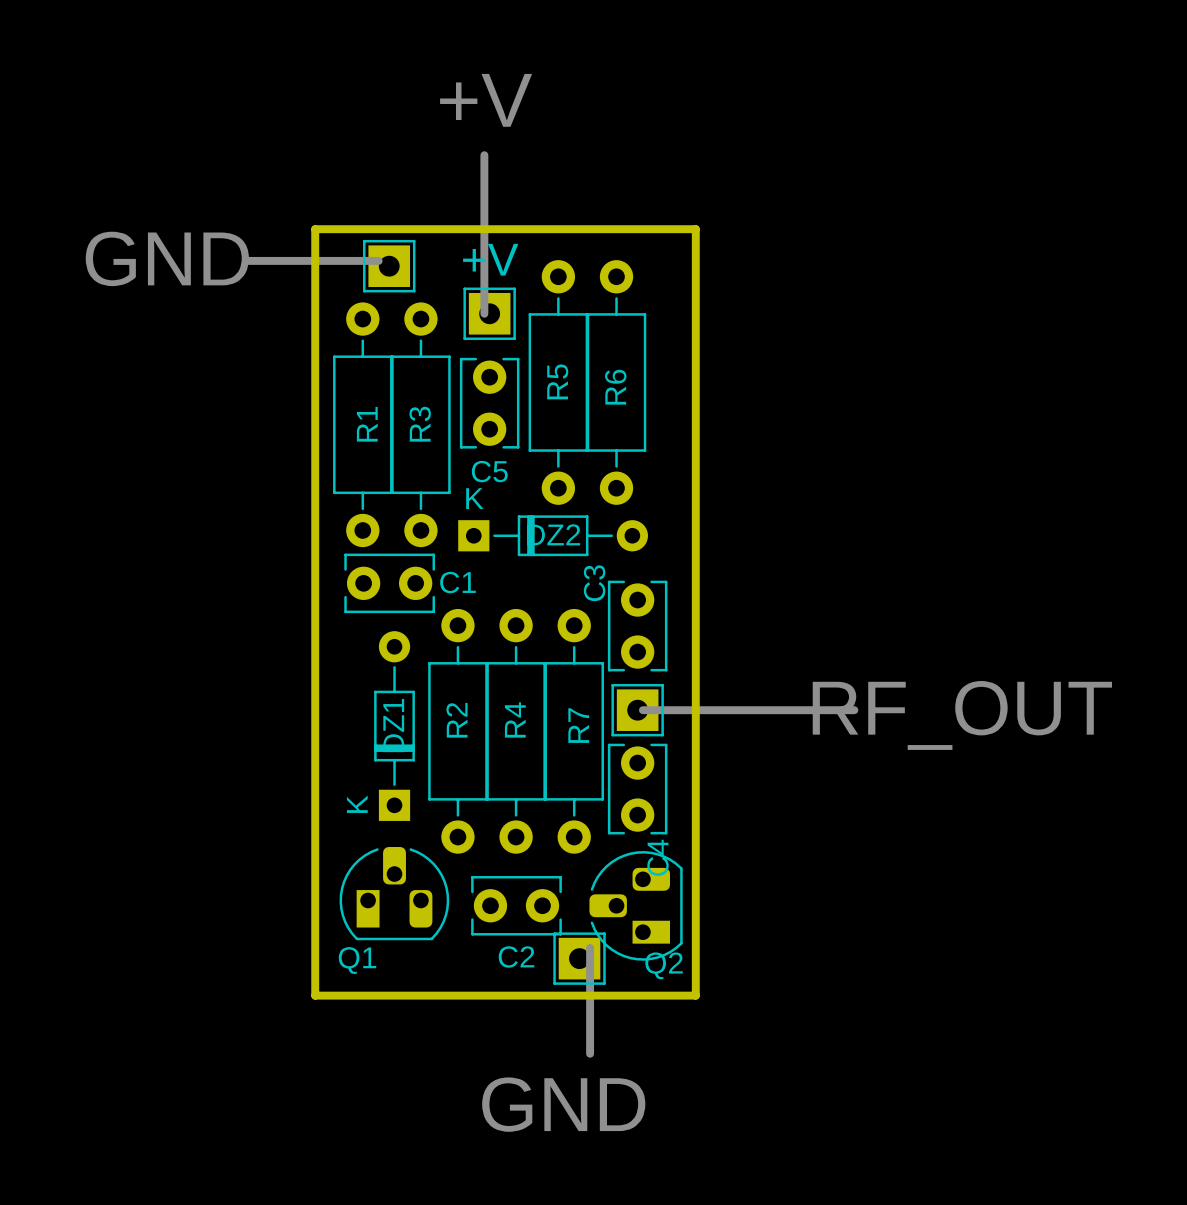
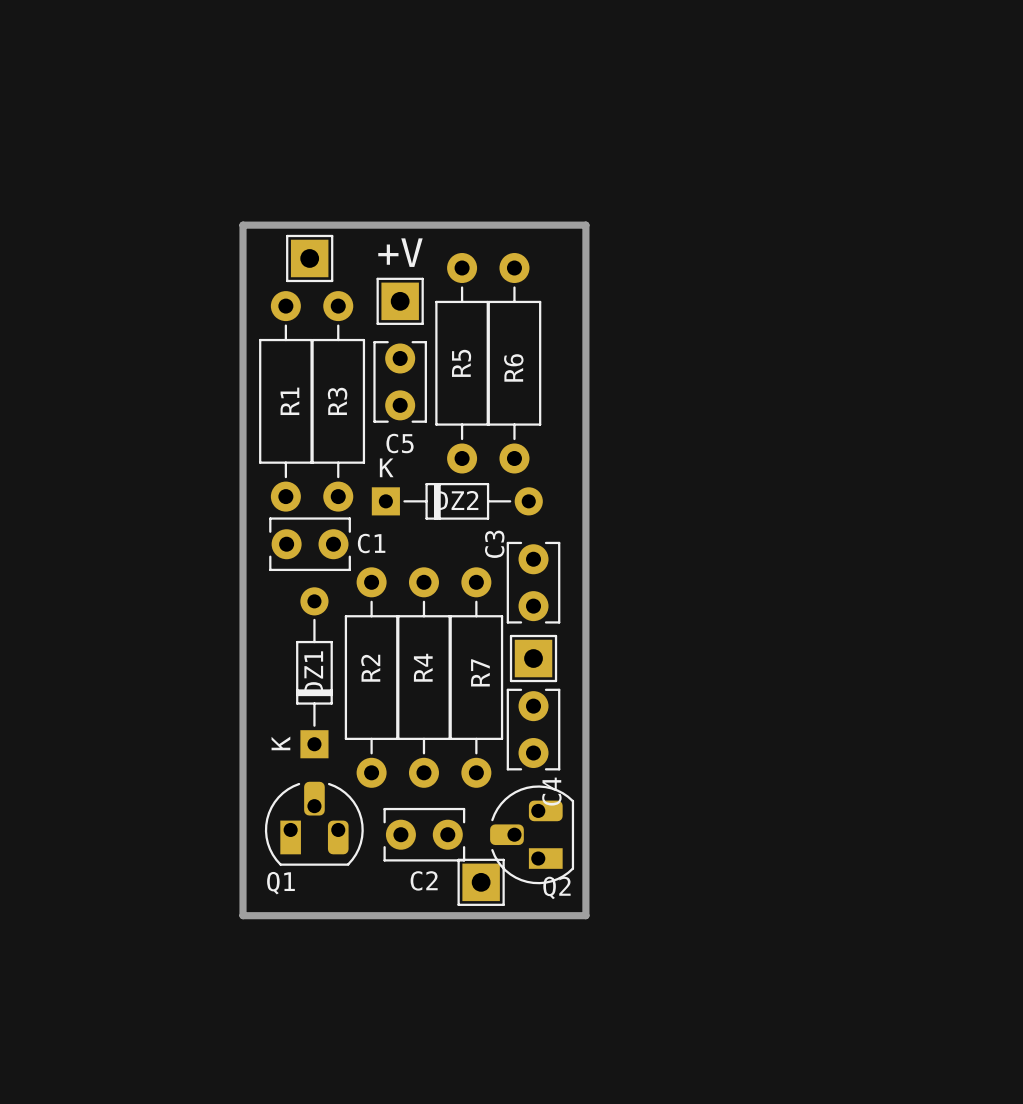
text: +V (486, 100) -> none
line: (484, 155) (484, 313) -> none
text: GND (167, 258) -> none
line: (246, 260) (378, 260) -> none
line: (642, 710) (854, 710) -> none
text: RF_OUT (962, 715) -> none
line: (590, 948) (590, 1053) -> none
text: GND (563, 1104) -> none

